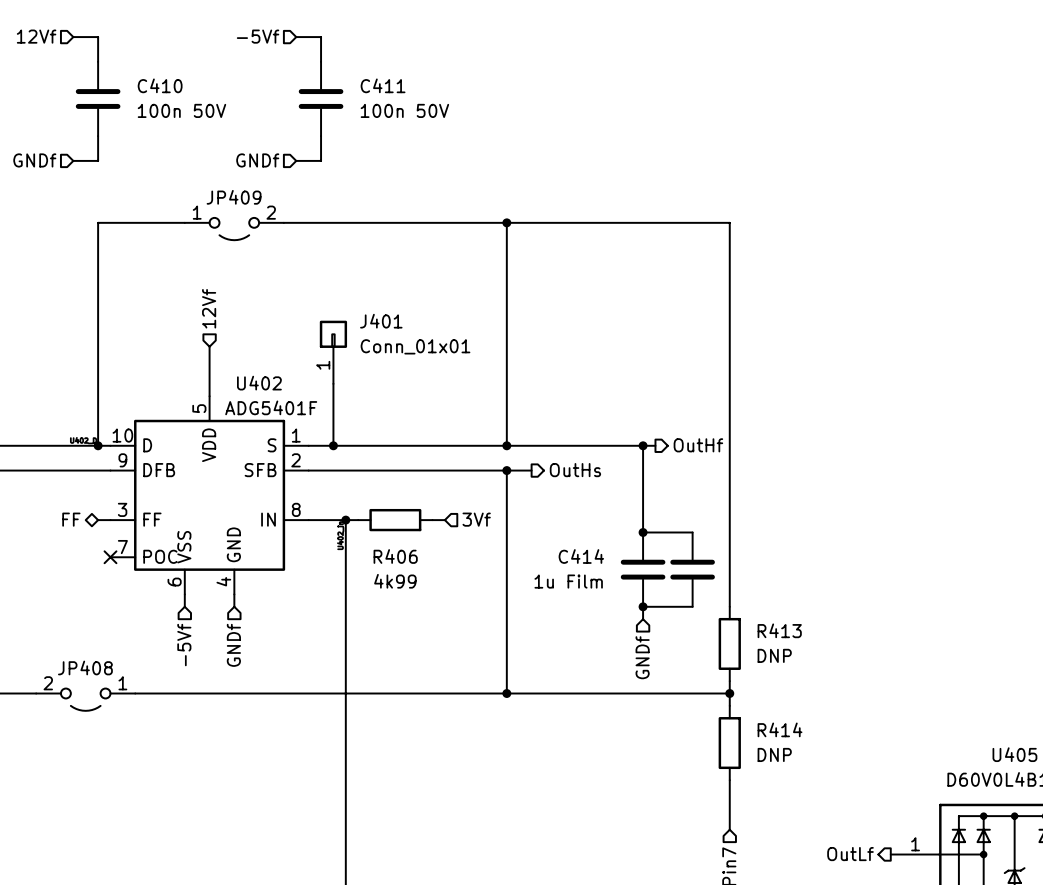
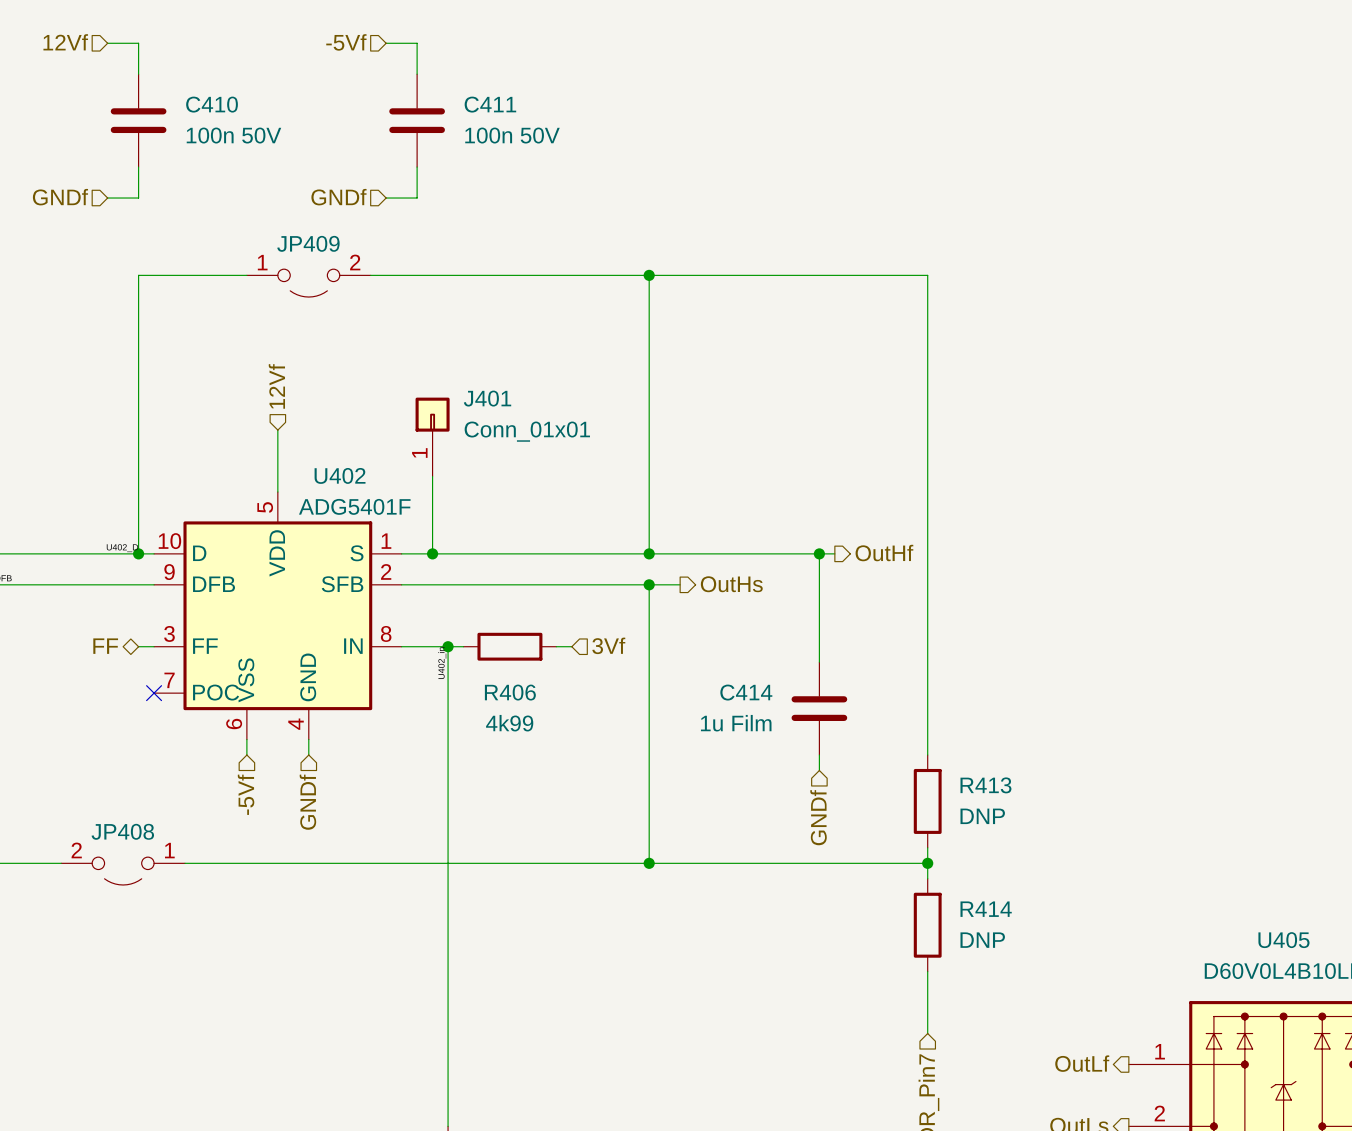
wire: (643, 532) (692, 532) -> none
junction: (643, 532) -> none
part: (692, 569) -> none
wire: (643, 606) (692, 606) -> none
junction: (643, 606) -> none

